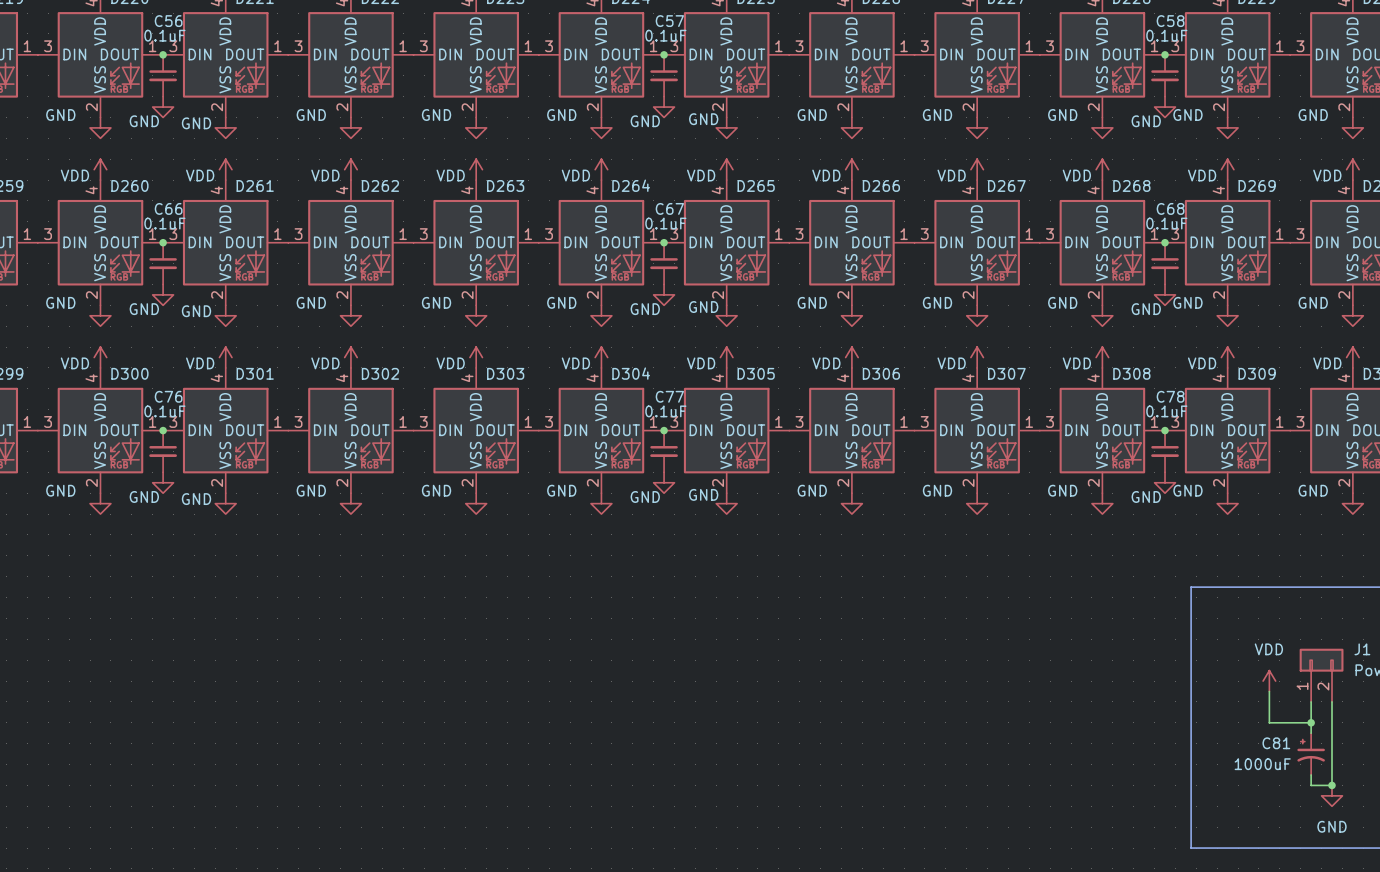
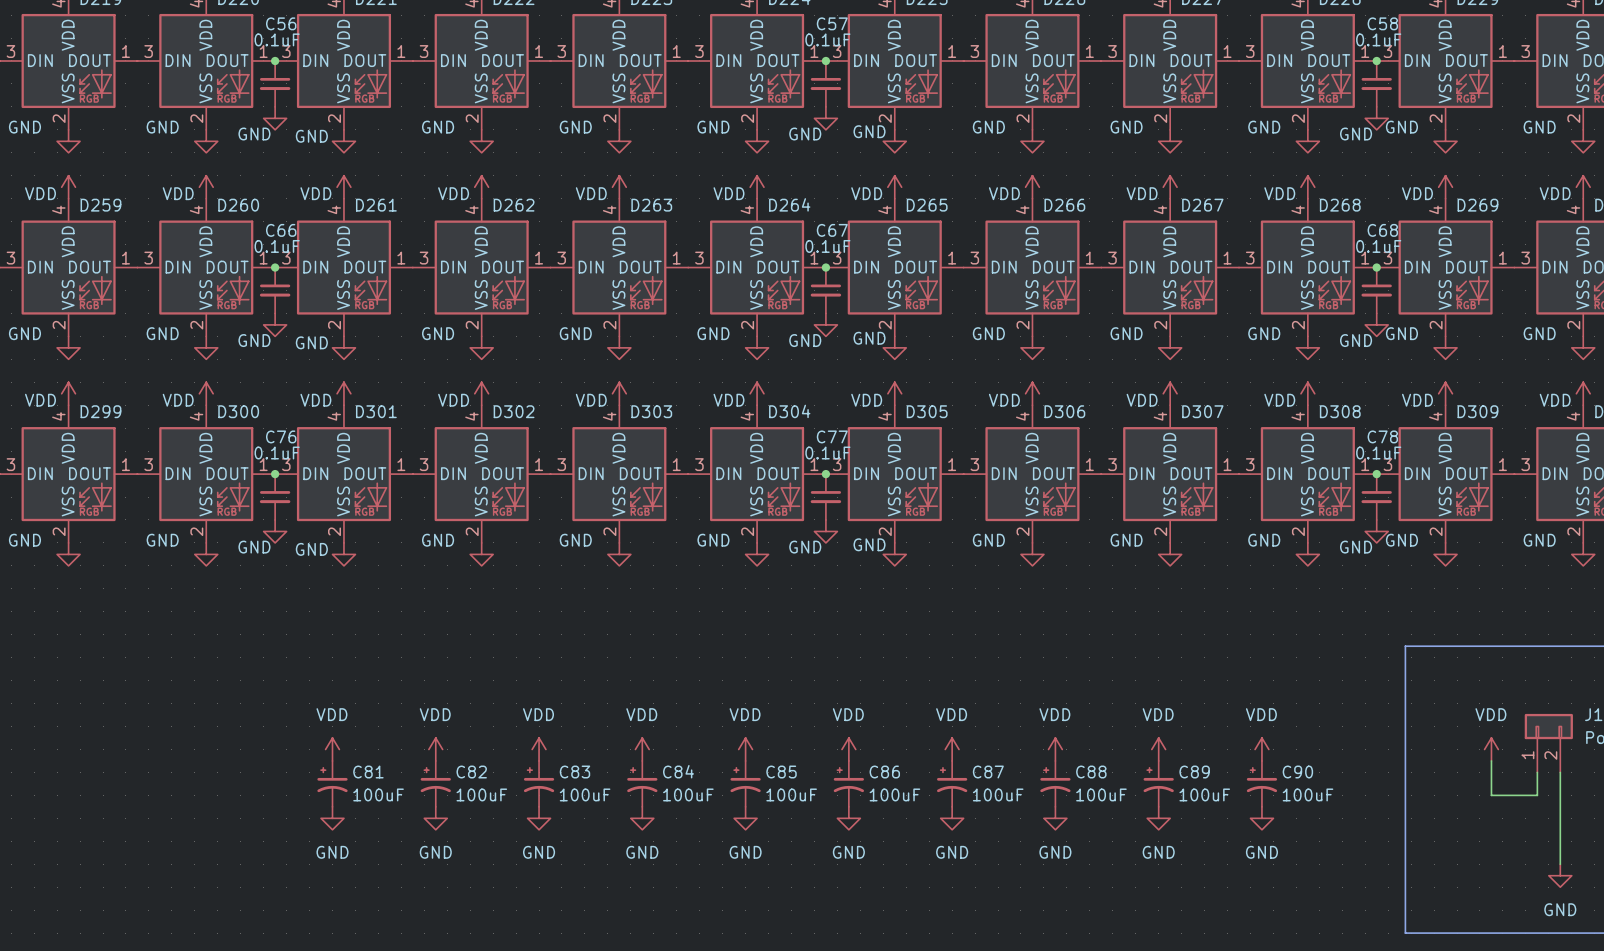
power symbol: none -> VDD (332, 749)
power symbol: none -> VDD (435, 749)
power symbol: none -> VDD (539, 749)
power symbol: none -> VDD (642, 749)
power symbol: none -> VDD (745, 749)
power symbol: none -> VDD (848, 749)
power symbol: none -> VDD (952, 749)
power symbol: none -> VDD (1055, 749)
power symbol: none -> VDD (1158, 749)
power symbol: none -> VDD (1261, 749)
C82: none -> 100uF (435, 783)
C83: none -> 100uF (539, 783)
C84: none -> 100uF (642, 783)
C85: none -> 100uF (745, 783)
C86: none -> 100uF (848, 783)
C87: none -> 100uF (952, 783)
C88: none -> 100uF (1055, 783)
C89: none -> 100uF (1158, 783)
C90: none -> 100uF (1261, 783)
wire: (1311, 722) (1311, 733) -> none
junction: (1311, 722) -> none
power symbol: none -> GND (332, 818)
power symbol: none -> GND (435, 818)
power symbol: none -> GND (539, 818)
power symbol: none -> GND (642, 818)
power symbol: none -> GND (745, 818)
power symbol: none -> GND (848, 818)
power symbol: none -> GND (952, 818)
power symbol: none -> GND (1055, 818)
power symbol: none -> GND (1158, 818)
power symbol: none -> GND (1261, 818)
C81 name position: C81 (1276, 743) -> C81 (368, 772)
C81 position: (1311, 754) -> (332, 783)
C81 value: 1000uF (1262, 764) -> 100uF (378, 794)
wire: (1311, 774) (1311, 785) (1332, 785) -> none
junction: (1332, 785) -> none

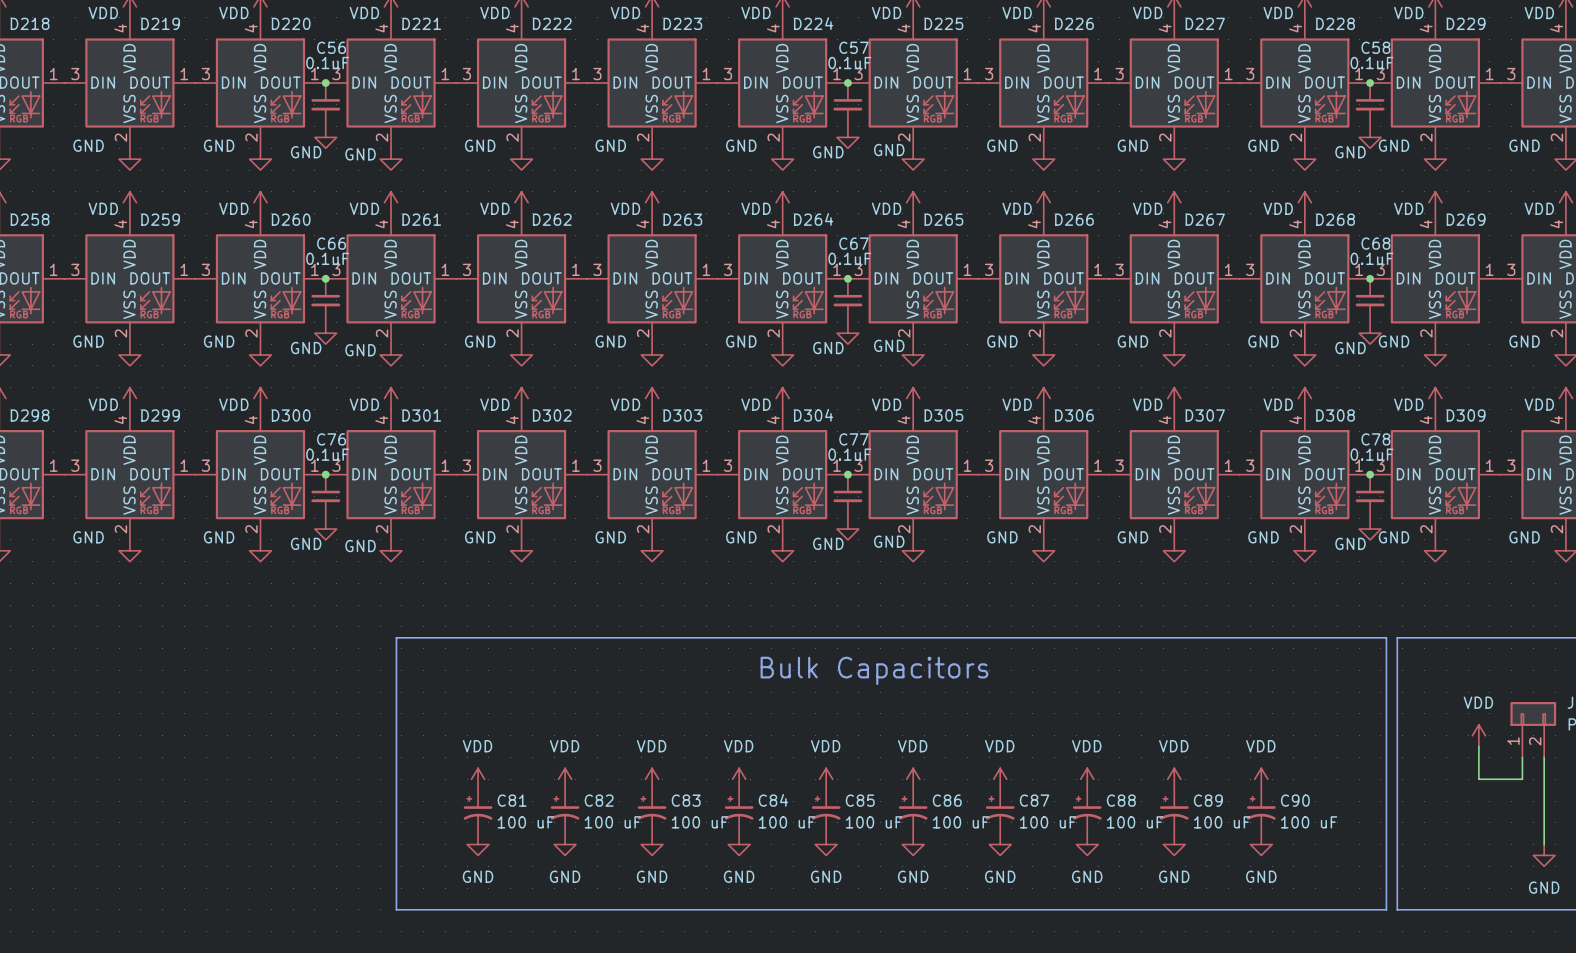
line: none -> (396, 637) (1386, 637) (1386, 909) (396, 909) (396, 637)
text: none -> Bulk Capacitors (874, 670)
power symbol: VDD (332, 749) -> none
power symbol position: VDD (435, 749) -> VDD (478, 779)
power symbol: VDD (539, 749) -> none
power symbol: VDD (642, 749) -> none
power symbol: VDD (745, 749) -> none
power symbol: VDD (848, 749) -> none
power symbol: VDD (952, 749) -> none
power symbol: VDD (1055, 749) -> none
power symbol: VDD (1158, 749) -> none
power symbol position: VDD (1261, 749) -> VDD (1261, 779)
C81 position: (332, 783) -> (478, 811)
C82 position: (435, 783) -> (565, 811)
C83 position: (539, 783) -> (652, 811)
C84 position: (642, 783) -> (739, 811)
C85 position: (745, 783) -> (826, 811)
C86 position: (848, 783) -> (913, 811)
C87 position: (952, 783) -> (1000, 811)
C88 position: (1055, 783) -> (1087, 811)
C89 position: (1158, 783) -> (1174, 811)
C90 position: (1261, 783) -> (1261, 811)
C81 value: 100uF (378, 794) -> 100 uF (525, 822)
C82 value: 100uF (481, 794) -> 100 uF (612, 822)
C83 value: 100uF (585, 794) -> 100 uF (699, 822)
C84 value: 100uF (688, 794) -> 100 uF (786, 822)
C85 value: 100uF (791, 794) -> 100 uF (873, 822)
C86 value: 100uF (894, 794) -> 100 uF (960, 822)
C87 value: 100uF (998, 794) -> 100 uF (1048, 822)
C88 value: 100uF (1101, 794) -> 100 uF (1135, 822)
C89 value: 100uF (1204, 794) -> 100 uF (1222, 822)
C90 value: 100uF (1308, 794) -> 100 uF (1309, 822)
power symbol: none -> VDD (565, 779)
power symbol: none -> VDD (652, 779)
power symbol: none -> VDD (739, 779)
power symbol: none -> VDD (826, 779)
power symbol: none -> VDD (913, 779)
power symbol: none -> VDD (1000, 779)
power symbol: none -> VDD (1087, 779)
power symbol: none -> VDD (1174, 779)
power symbol: GND (332, 818) -> none
power symbol position: GND (435, 818) -> GND (478, 844)
power symbol: GND (539, 818) -> none
power symbol: GND (642, 818) -> none
power symbol: GND (745, 818) -> none
power symbol: GND (848, 818) -> none
power symbol: GND (952, 818) -> none
power symbol: GND (1055, 818) -> none
power symbol: GND (1158, 818) -> none
power symbol position: GND (1261, 818) -> GND (1261, 844)
power symbol: none -> GND (565, 844)
power symbol: none -> GND (652, 844)
power symbol: none -> GND (739, 844)
power symbol: none -> GND (826, 844)
power symbol: none -> GND (913, 844)
power symbol: none -> GND (1000, 844)
power symbol: none -> GND (1087, 844)
power symbol: none -> GND (1174, 844)

